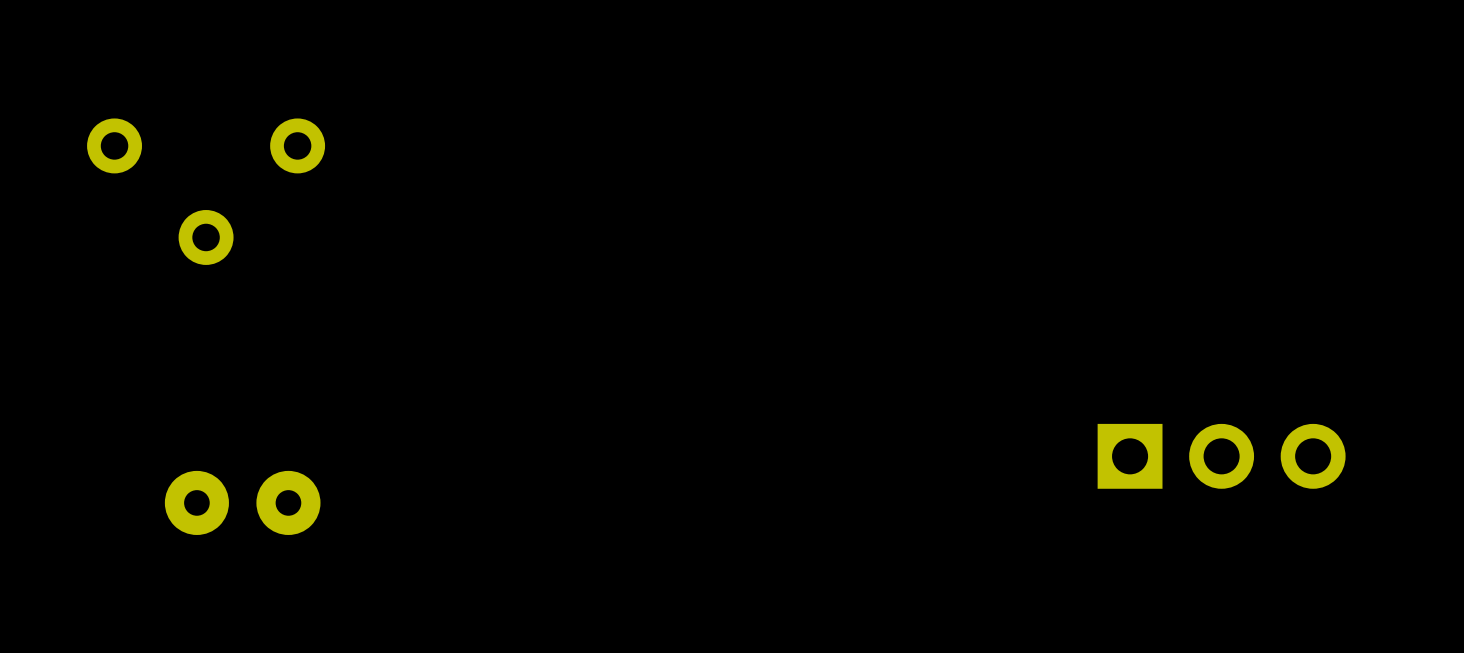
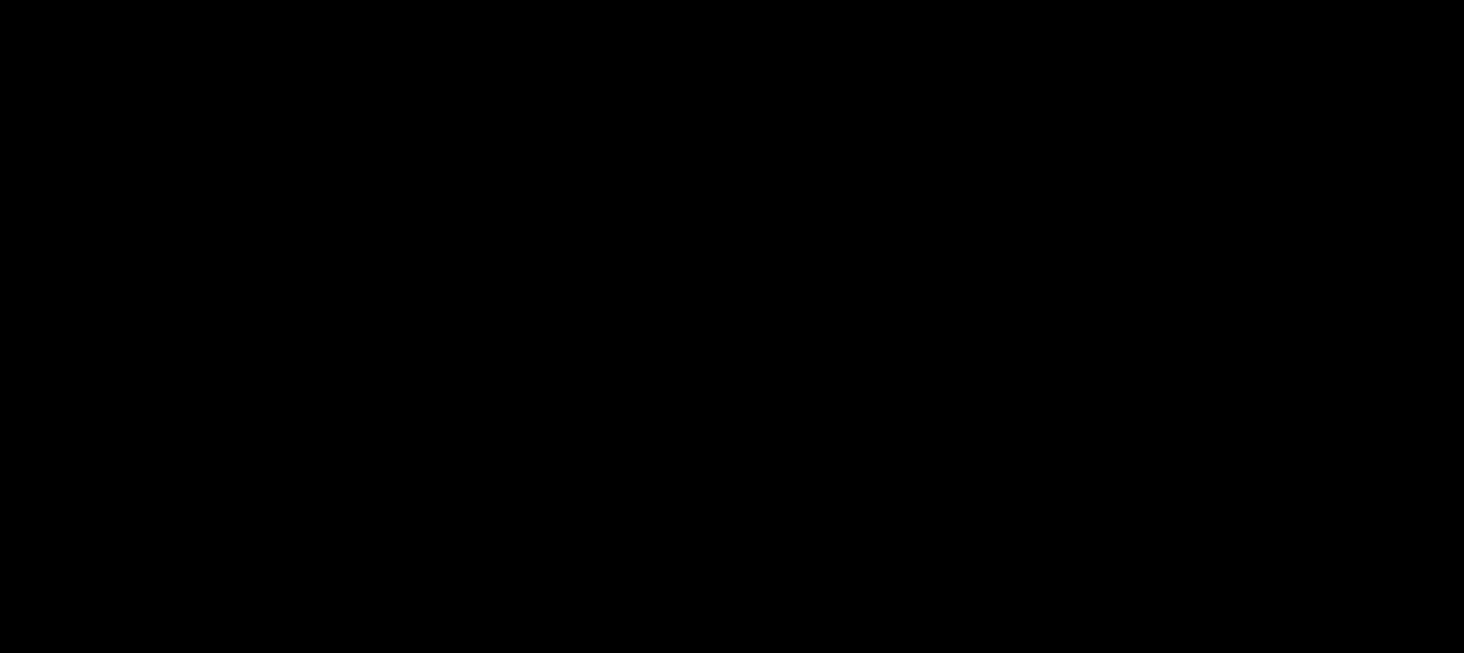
part: (206, 191) -> none
part: (1221, 456) -> none
part: (242, 502) -> none

